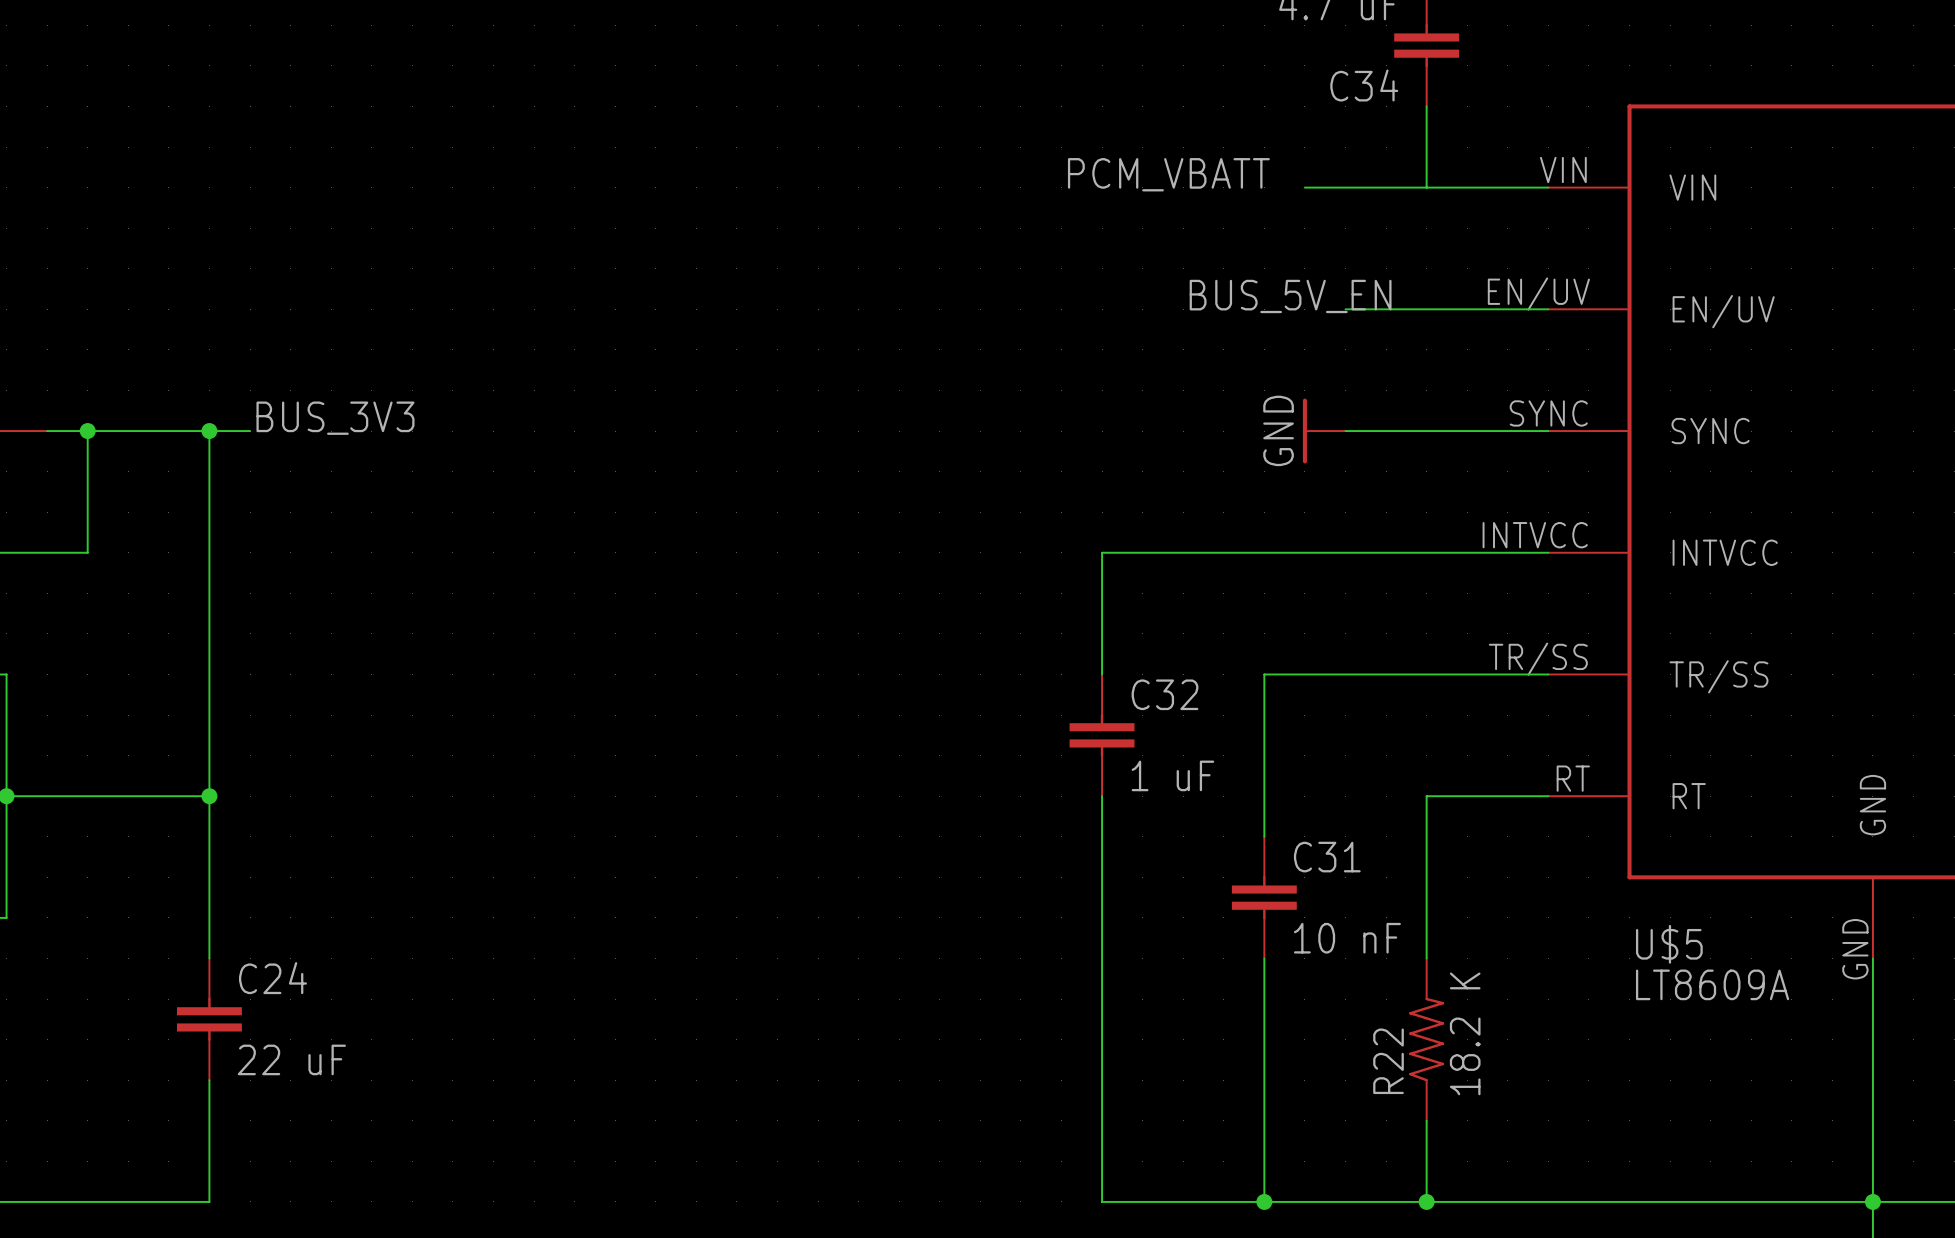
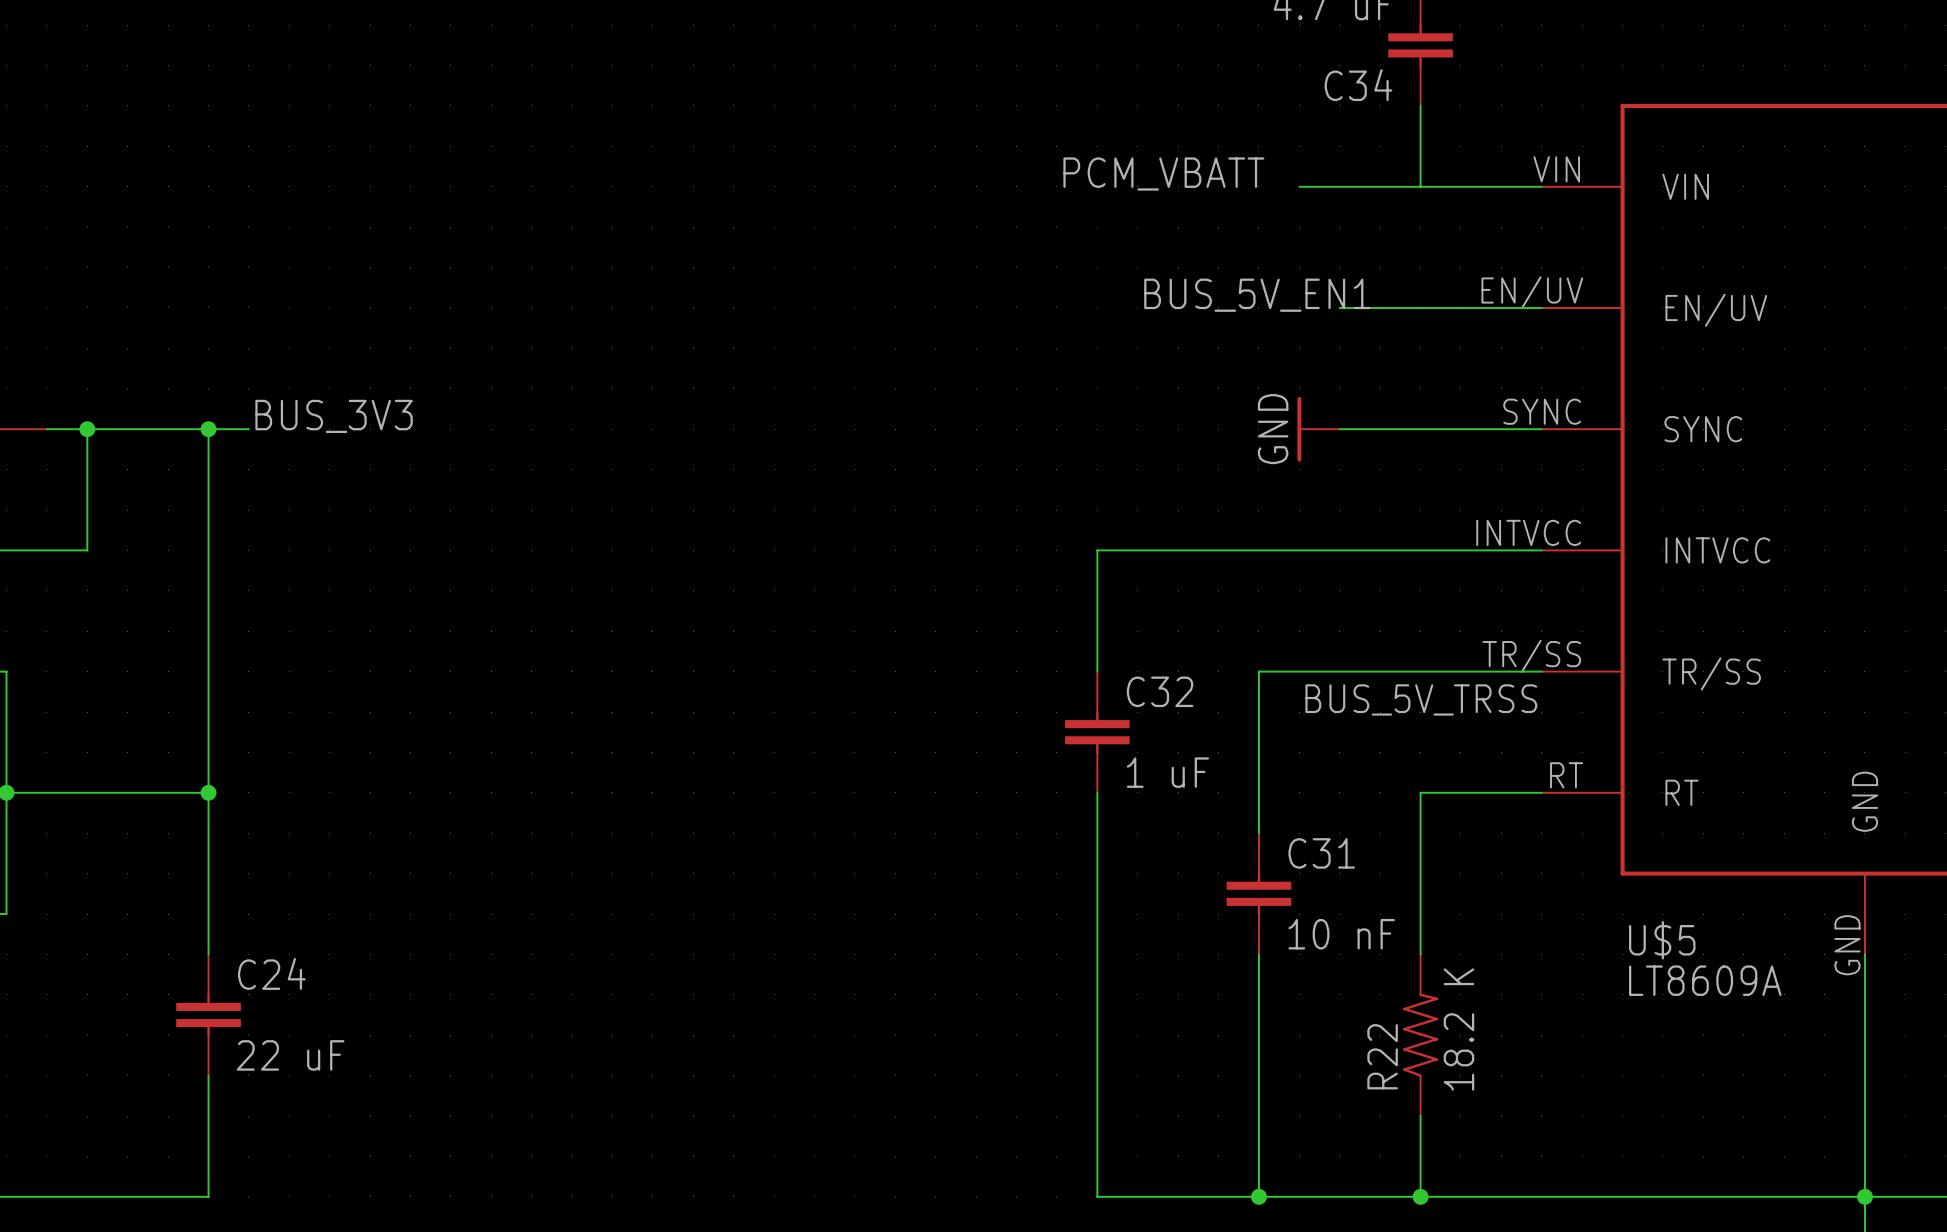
label: BUS_5V_EN (1290, 296) -> BUS_5V_EN1 (1257, 295)
label: none -> BUS_5V_TRSS (1421, 699)

